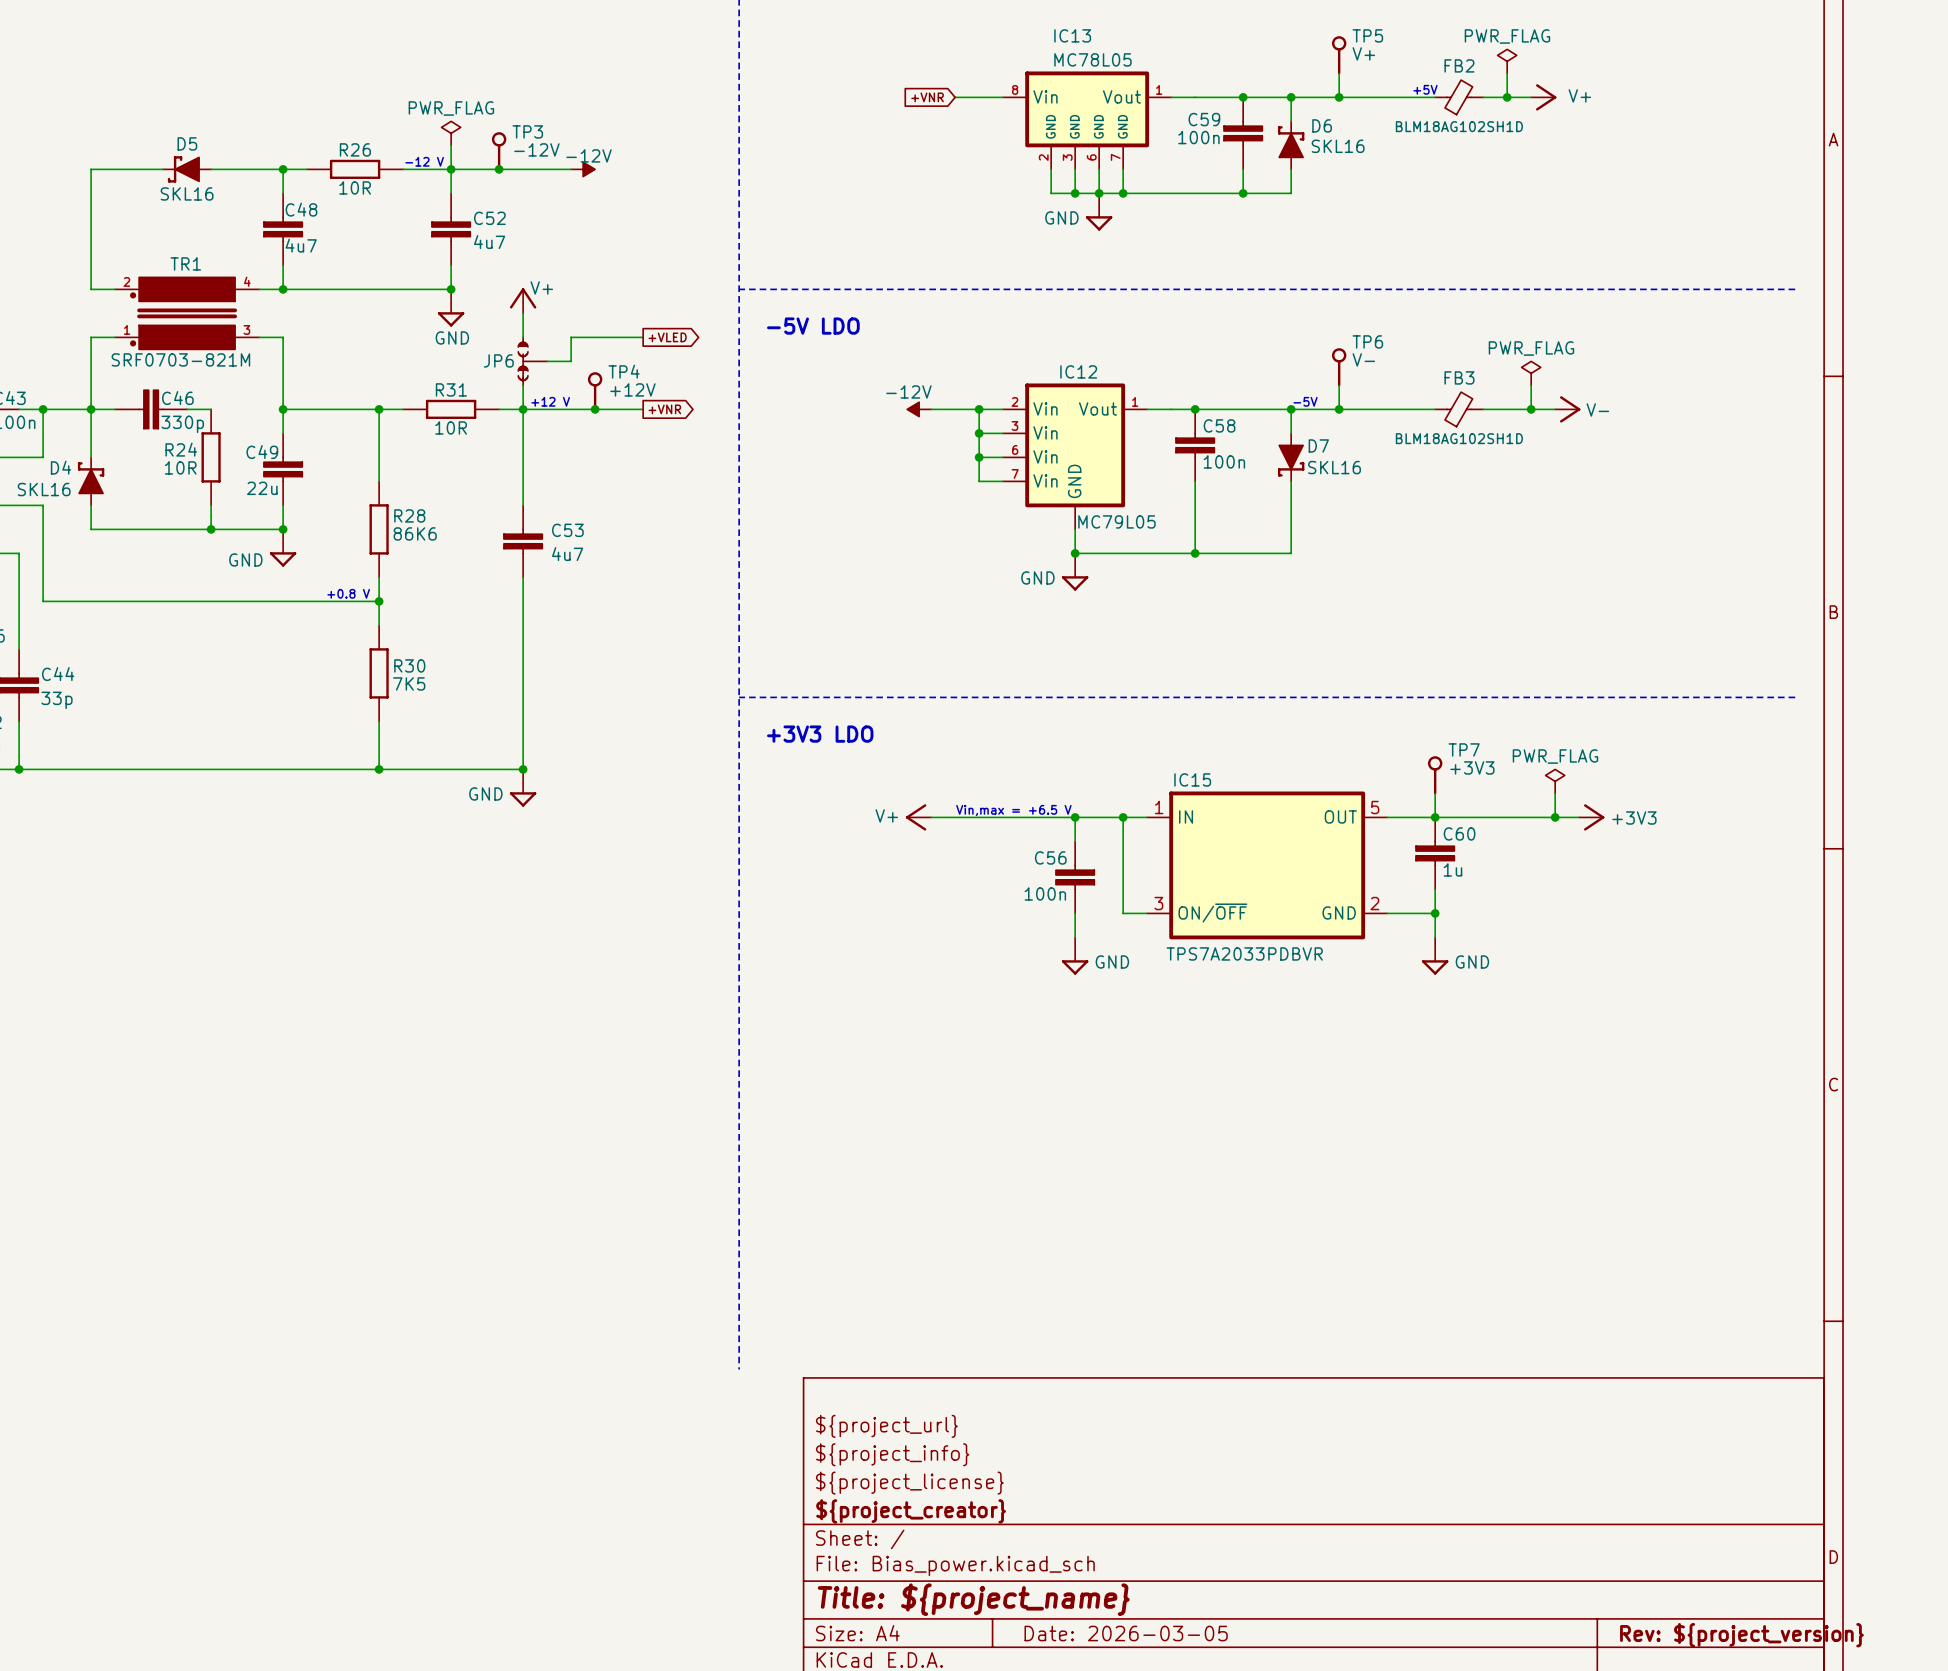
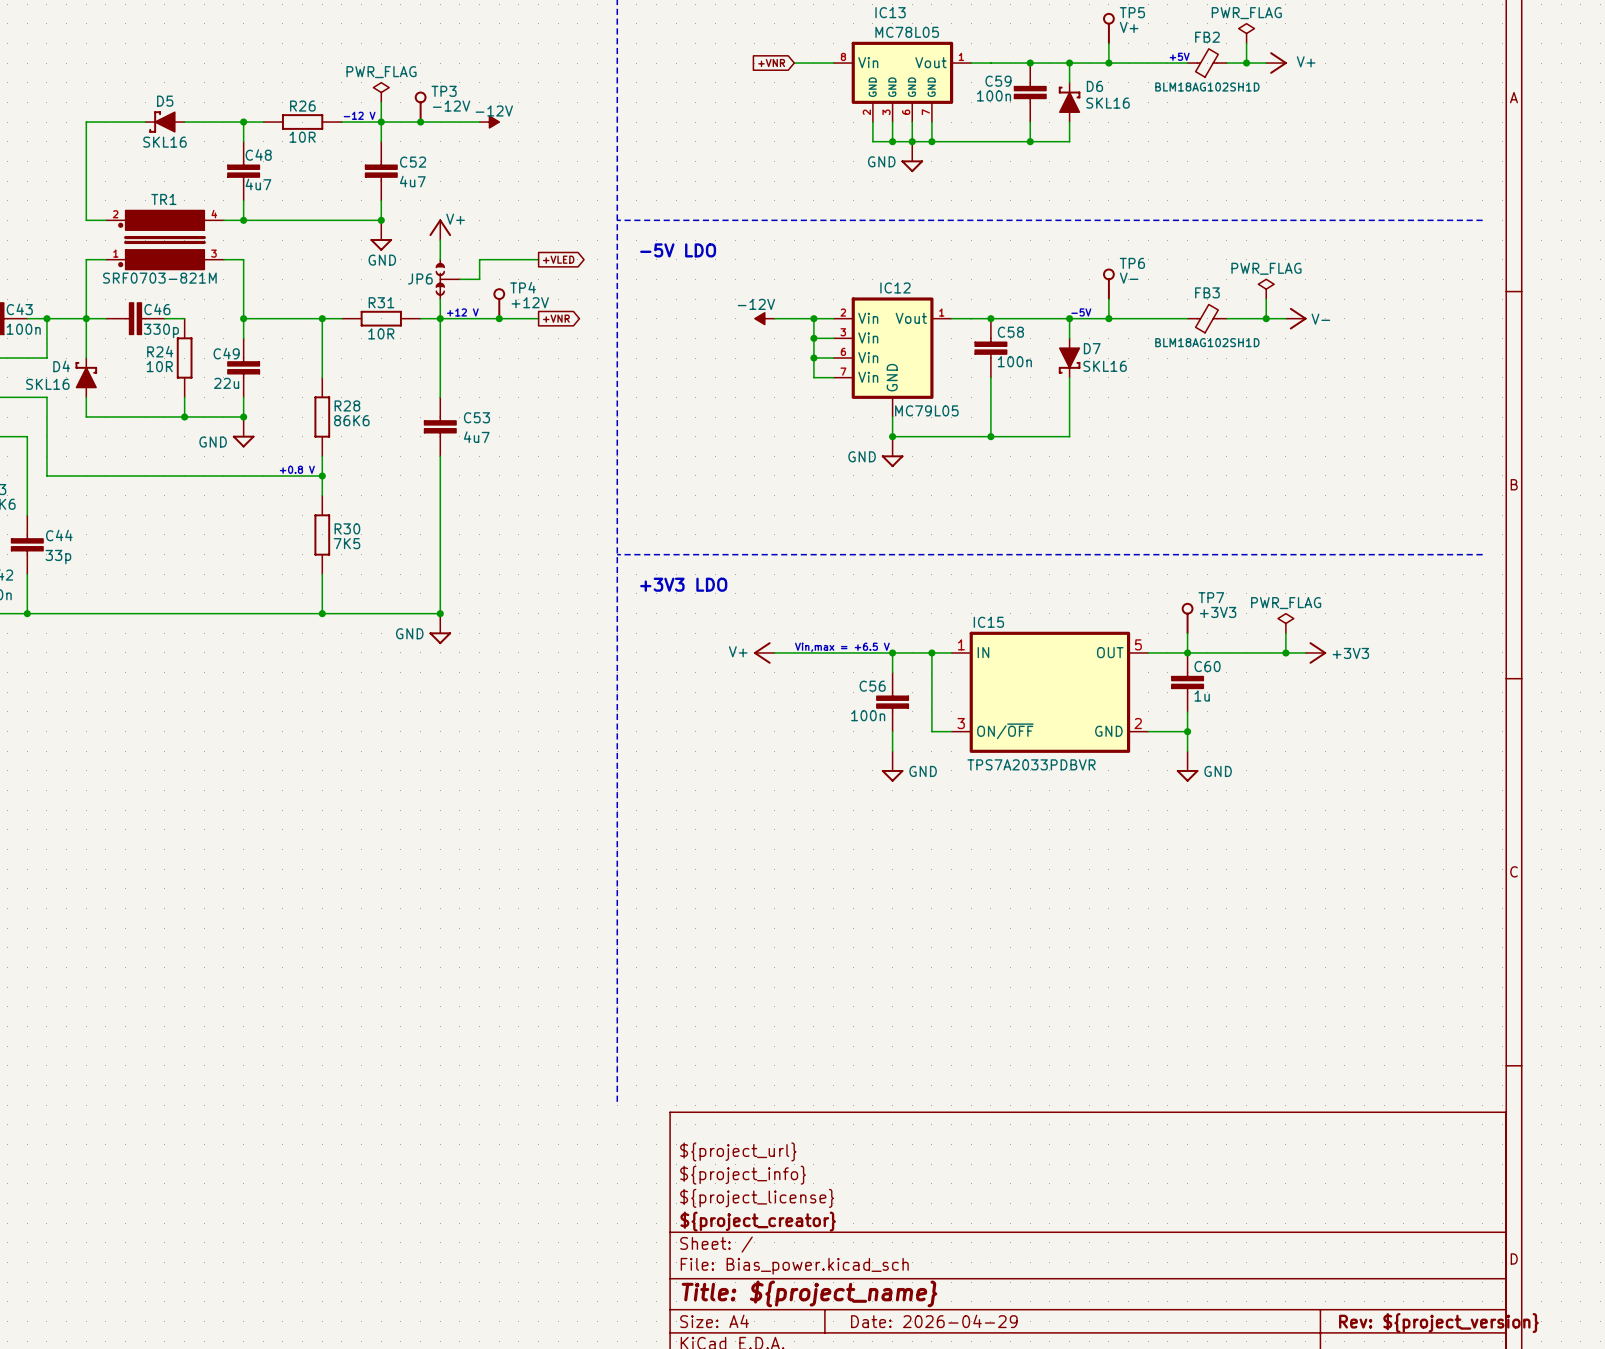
title block: Date: 2026-03-05 (1126, 1633) -> Date: 2026-04-29 (934, 1321)

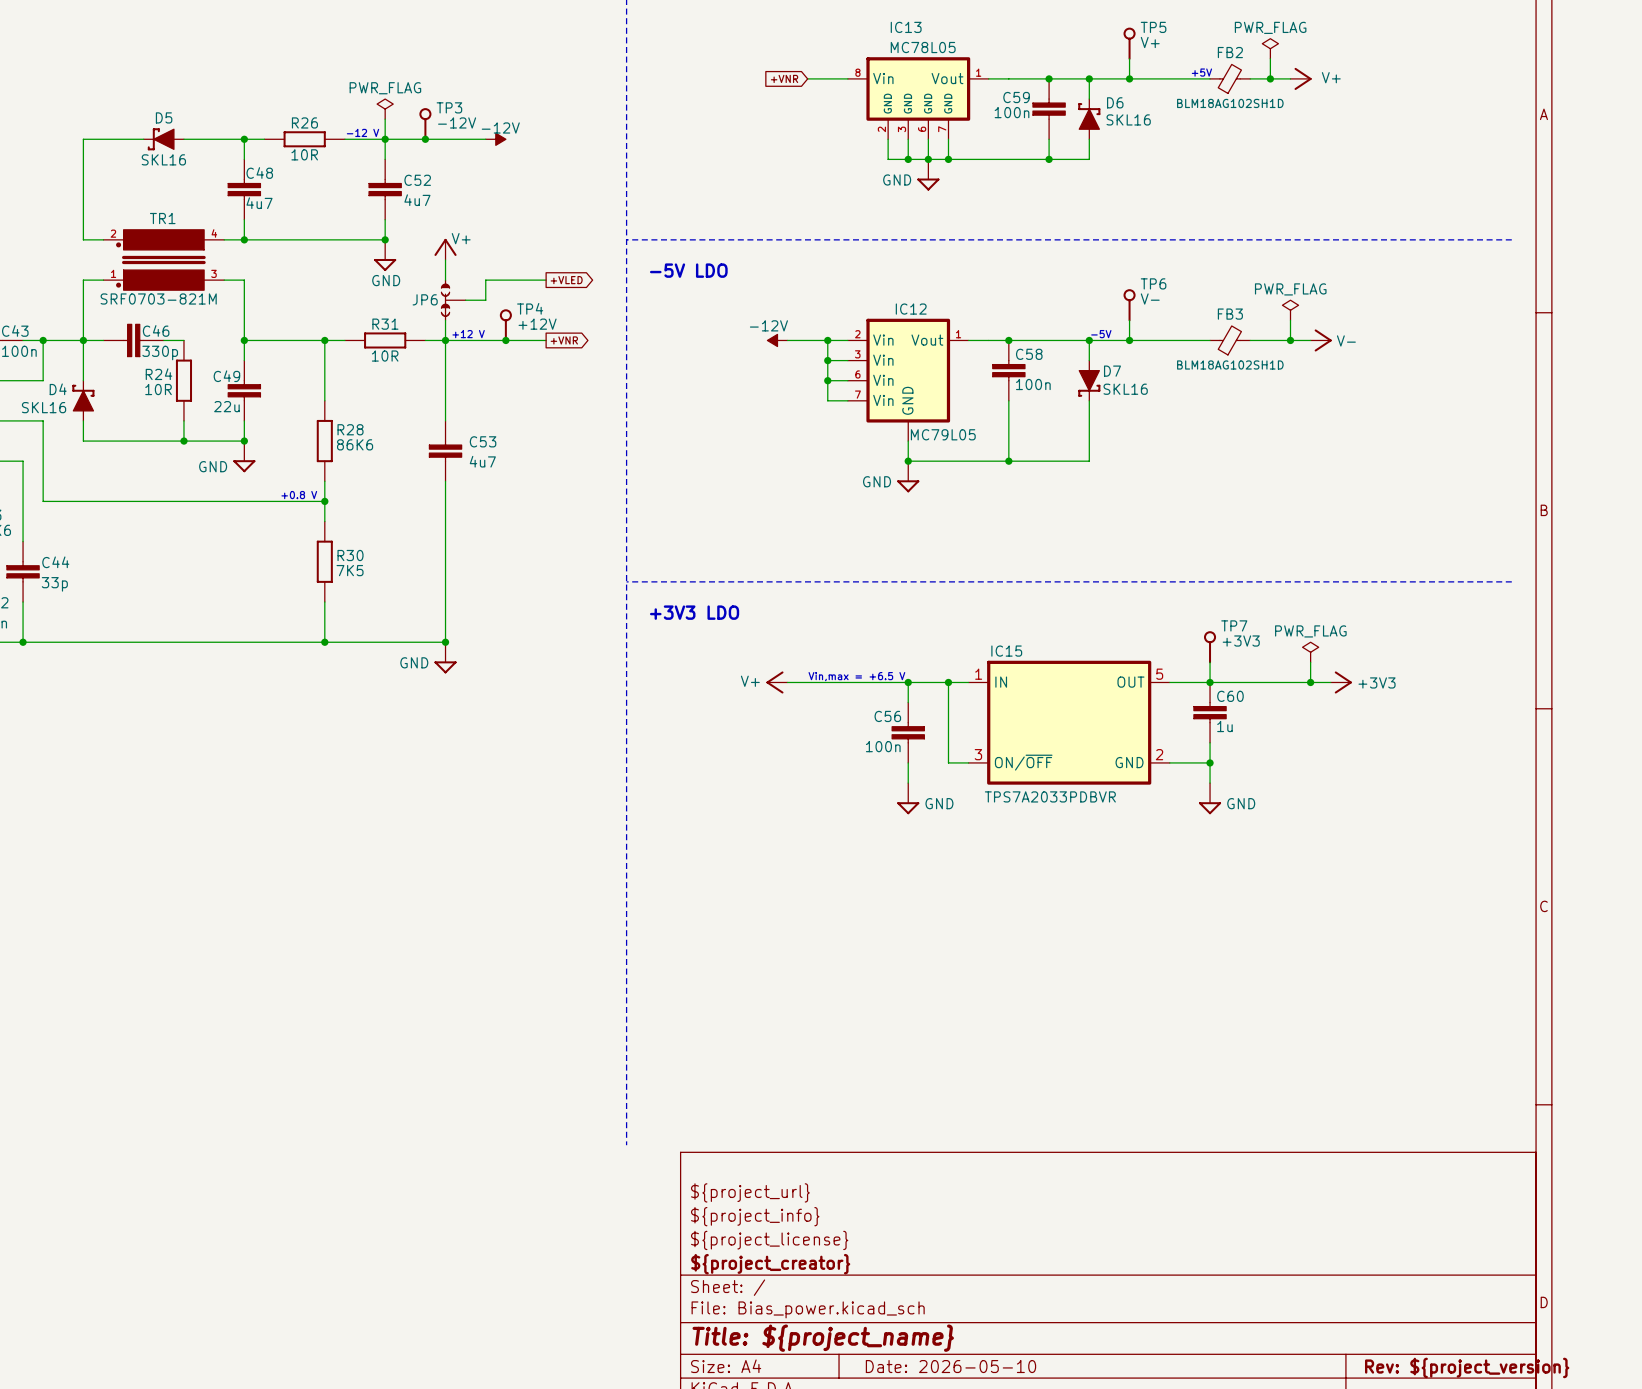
title block: Date: 2026-04-29 (934, 1321) -> Date: 2026-05-10 (950, 1366)

